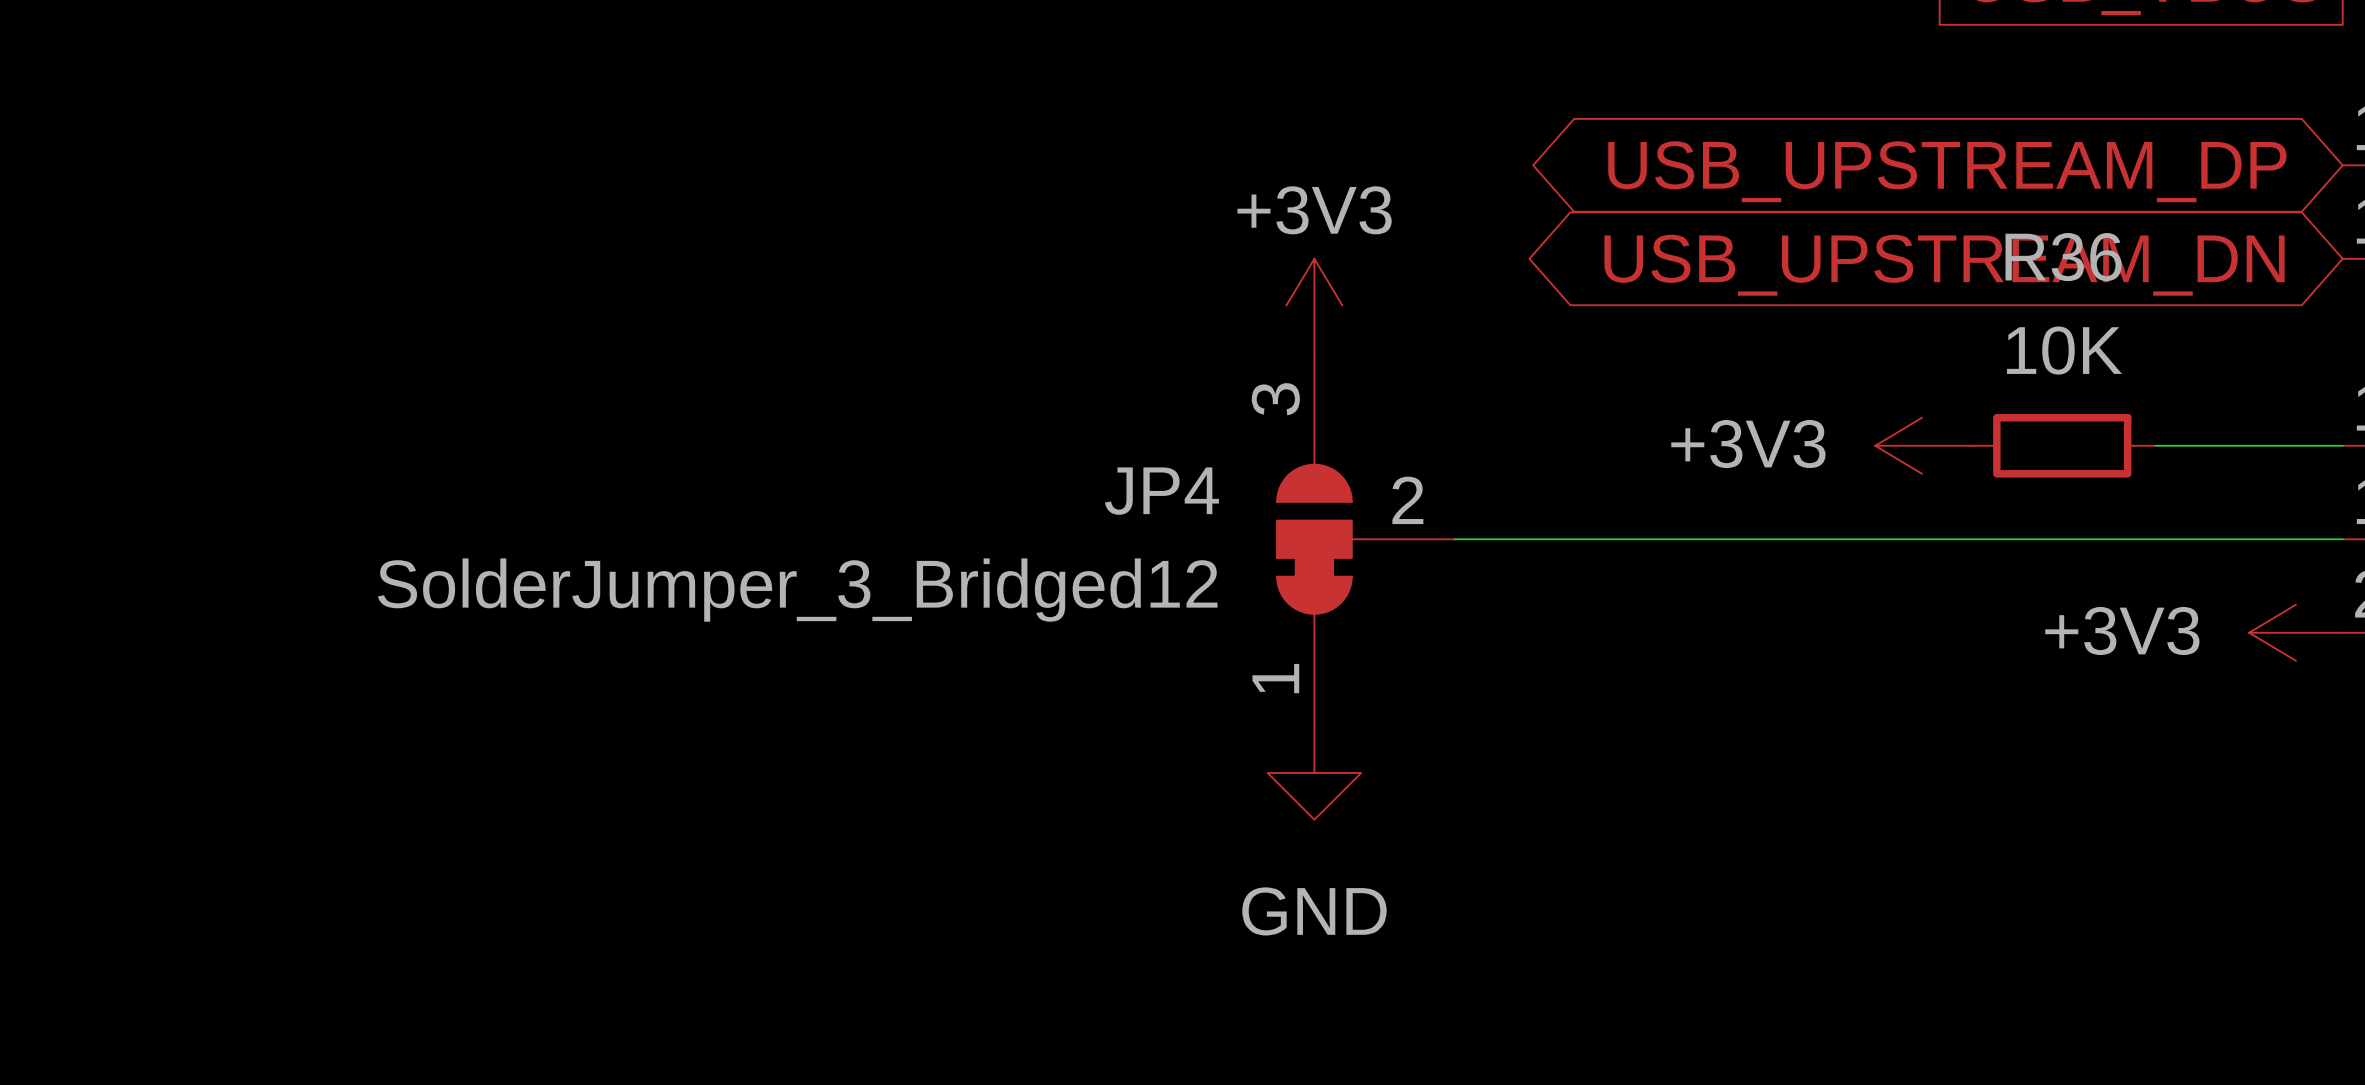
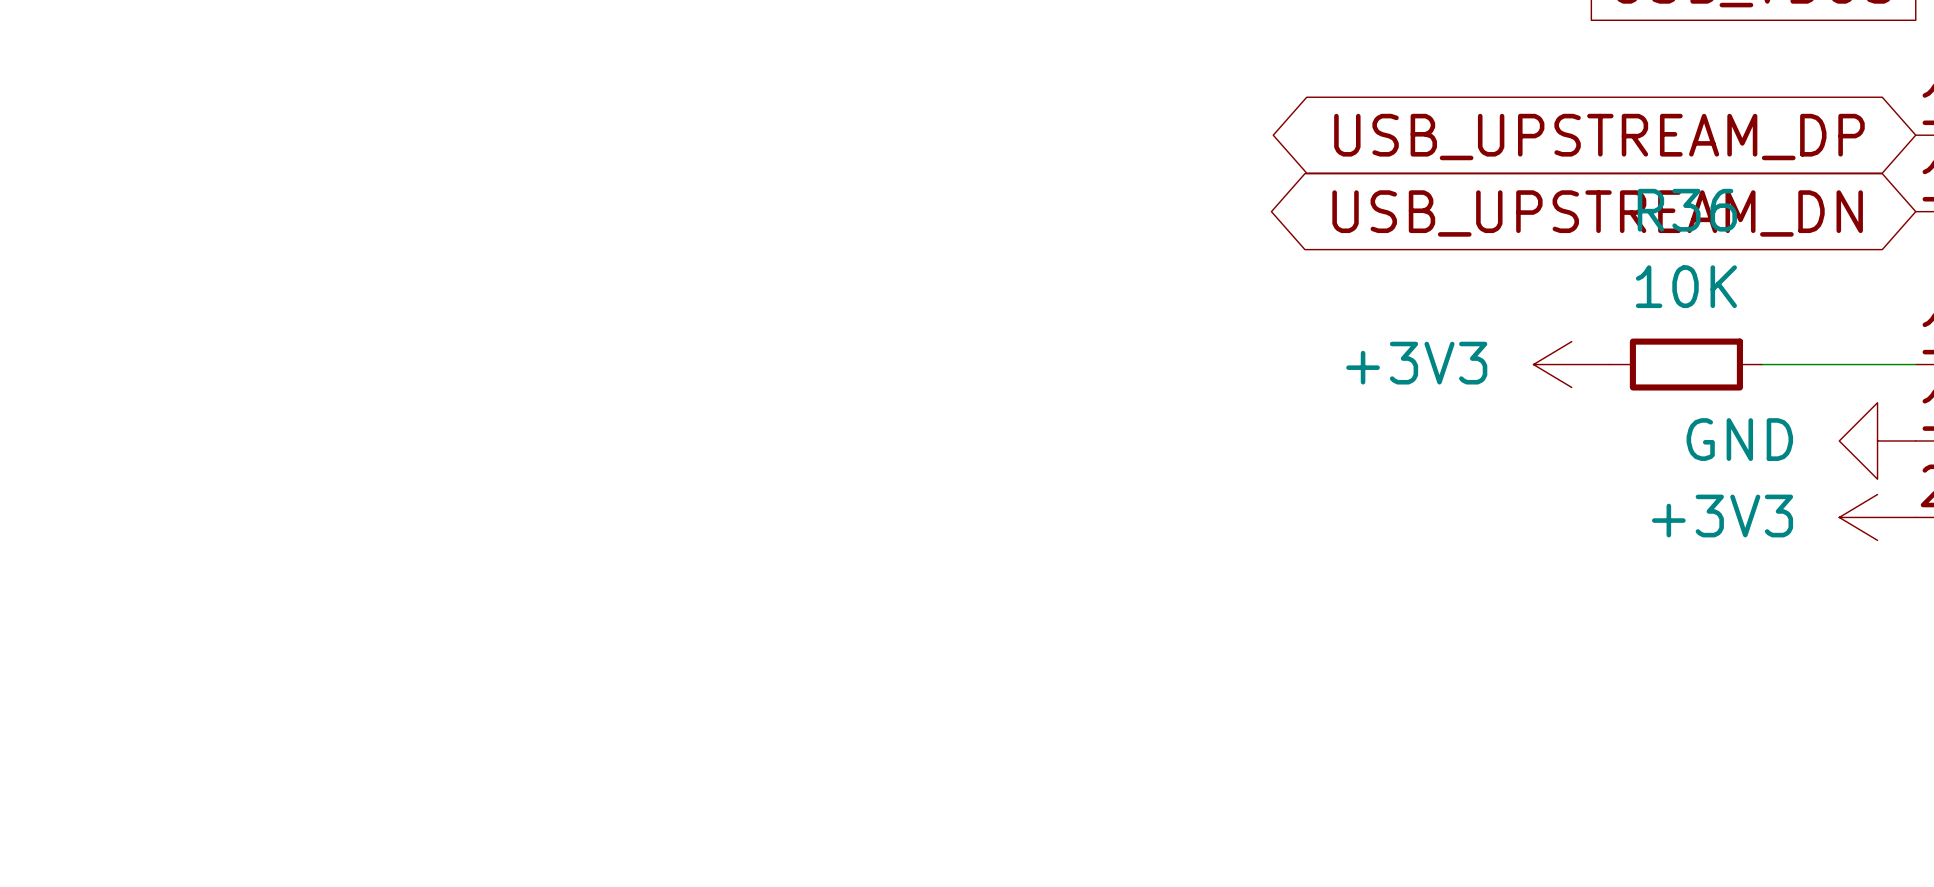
power symbol: +3V3 (1314, 305) -> none
JP4: SolderJumper_3_Bridged12 (1365, 539) -> none
wire: (1454, 539) (2342, 539) -> none
power symbol: none -> GND (1877, 440)
power symbol: GND (1314, 772) -> none

